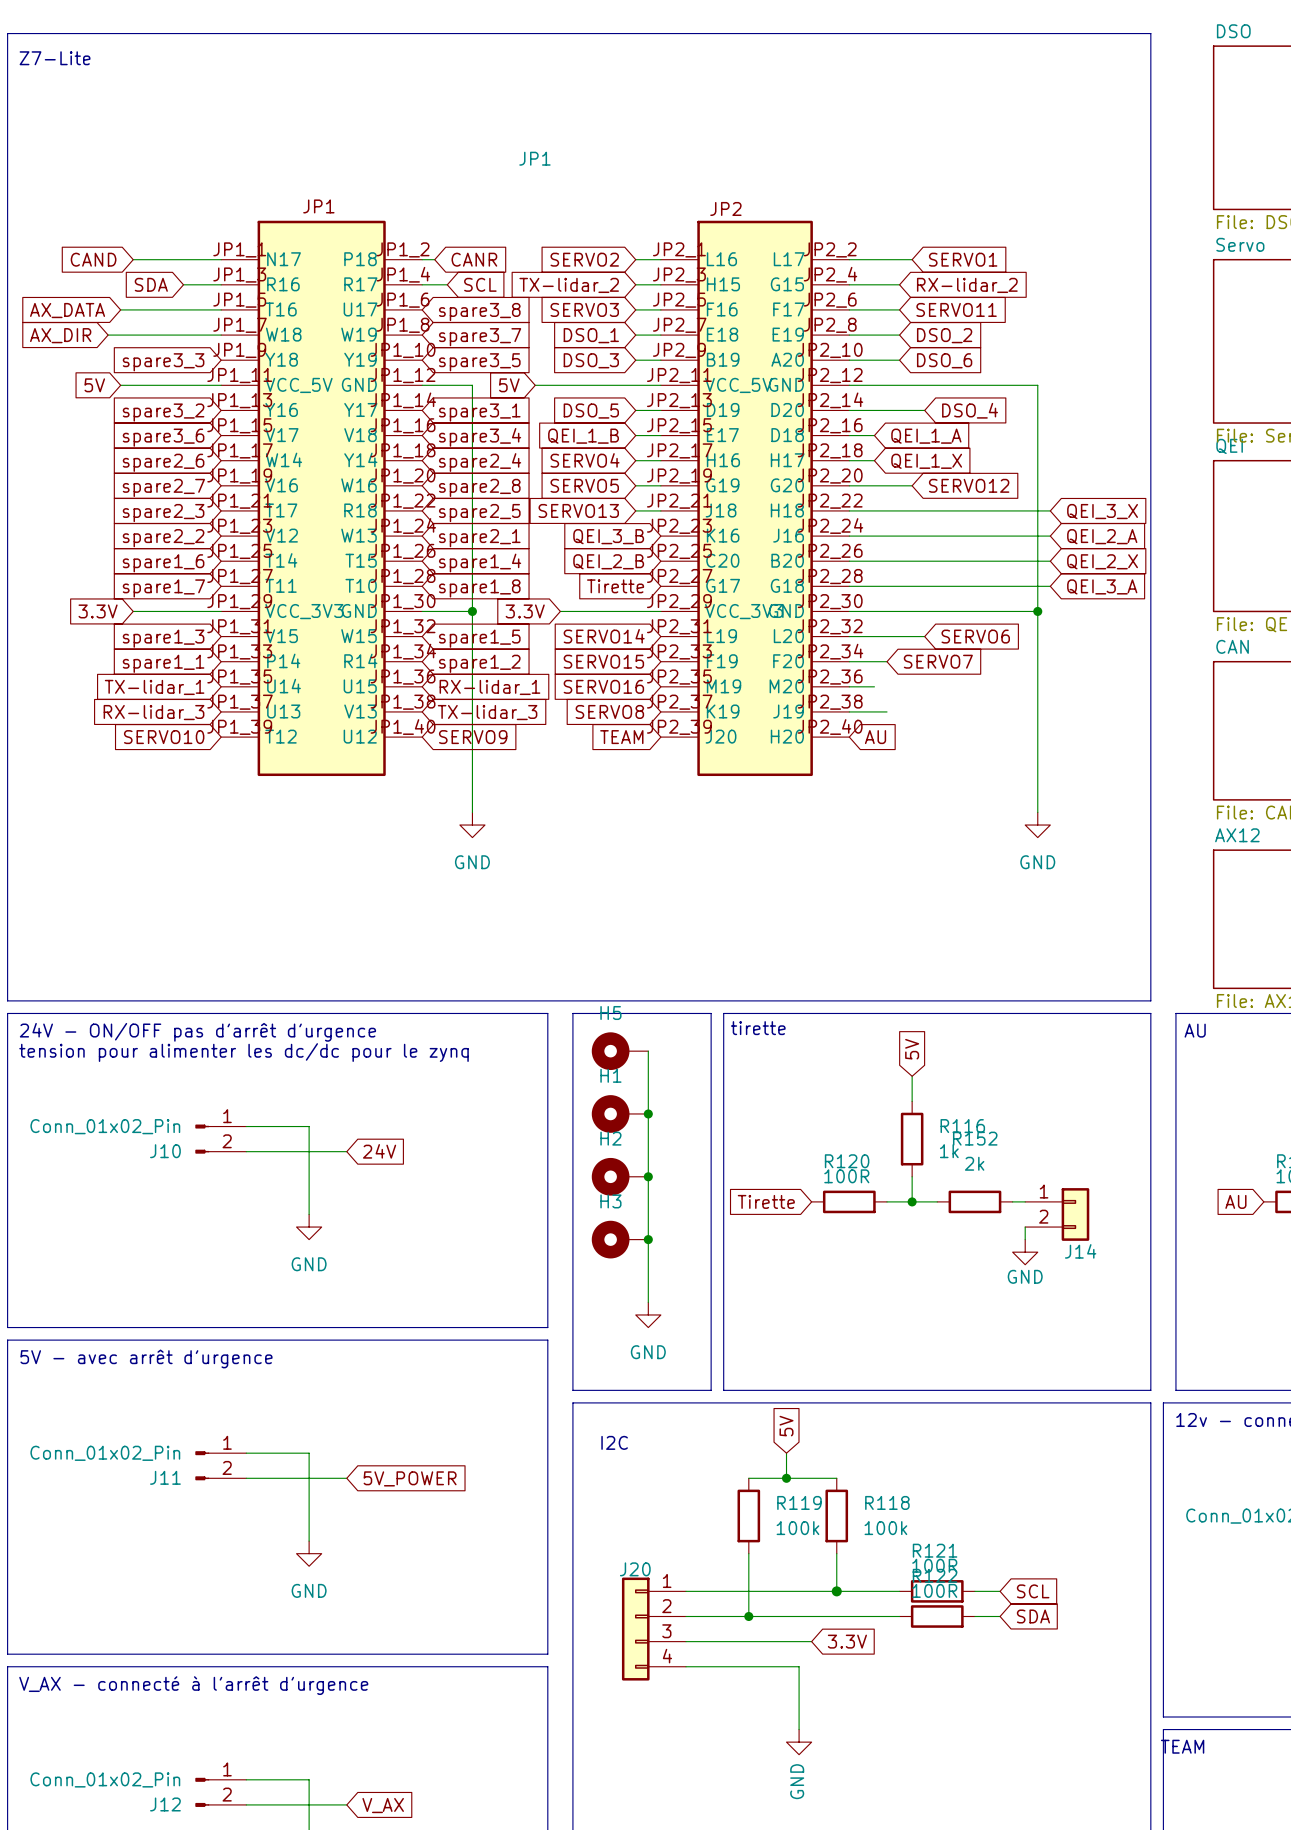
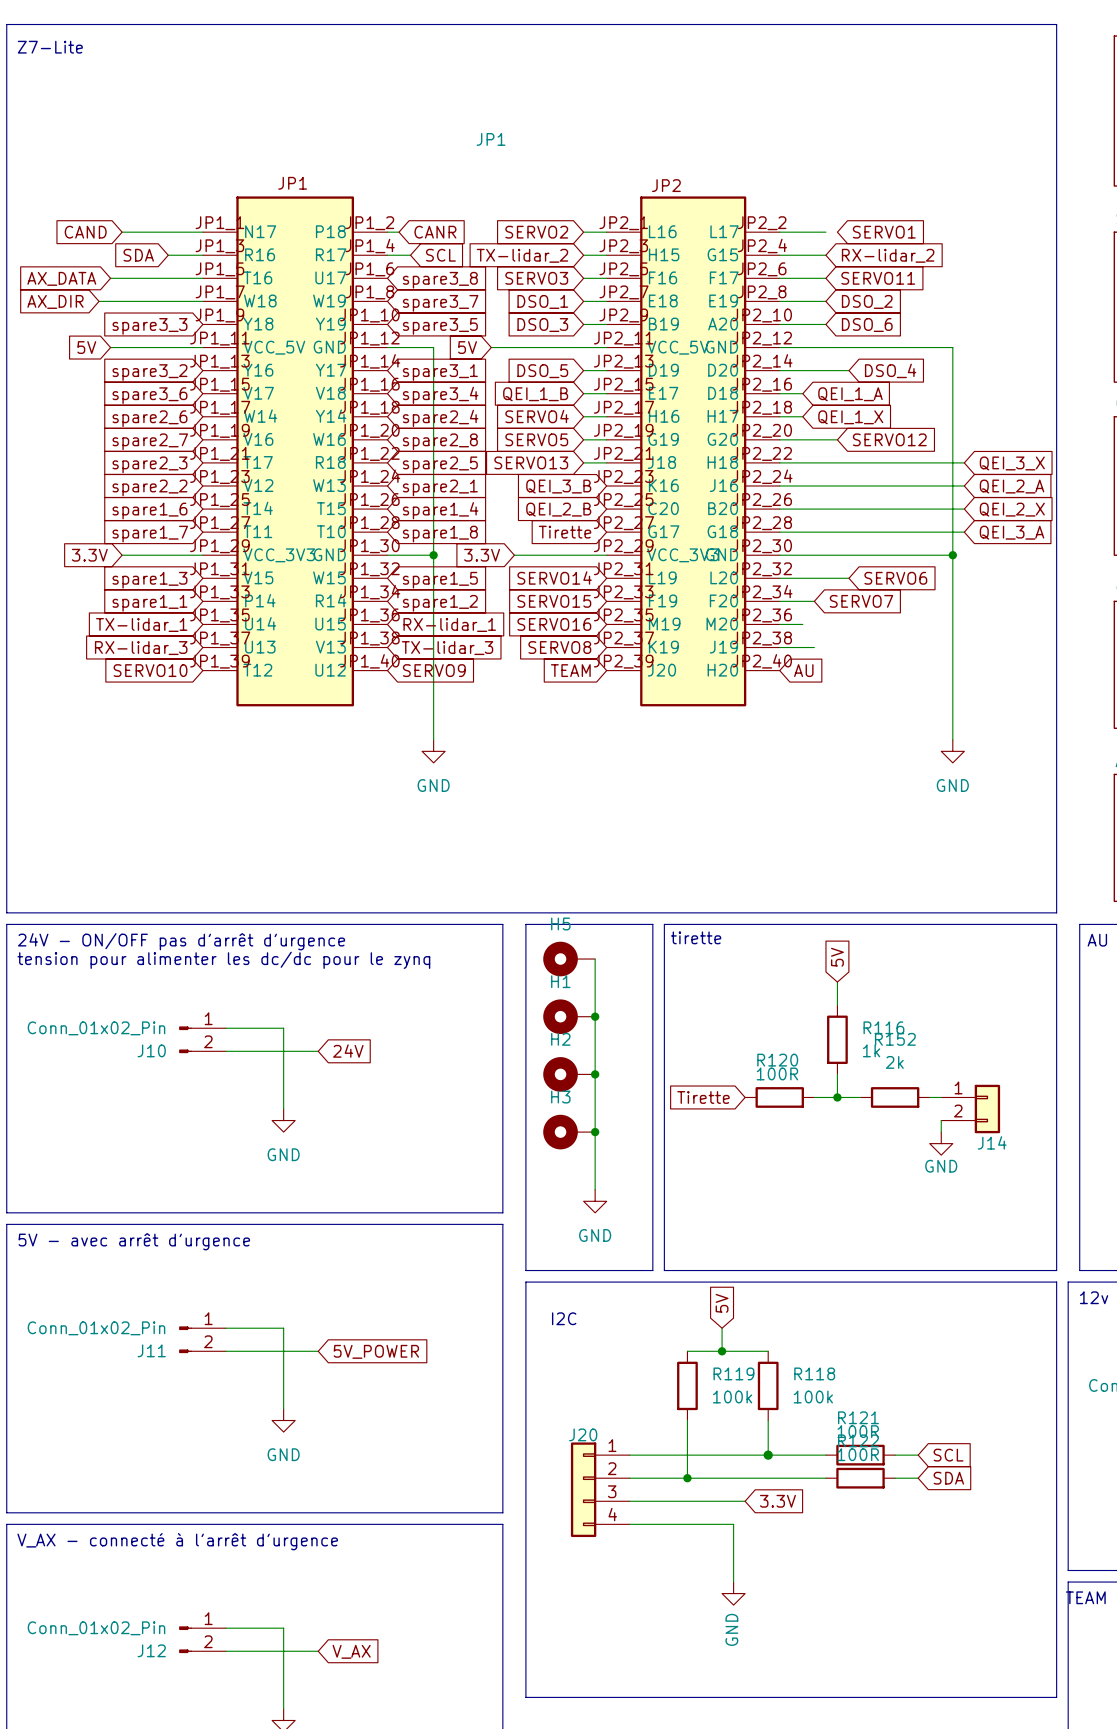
wire: (899, 259) (912, 259) -> none

